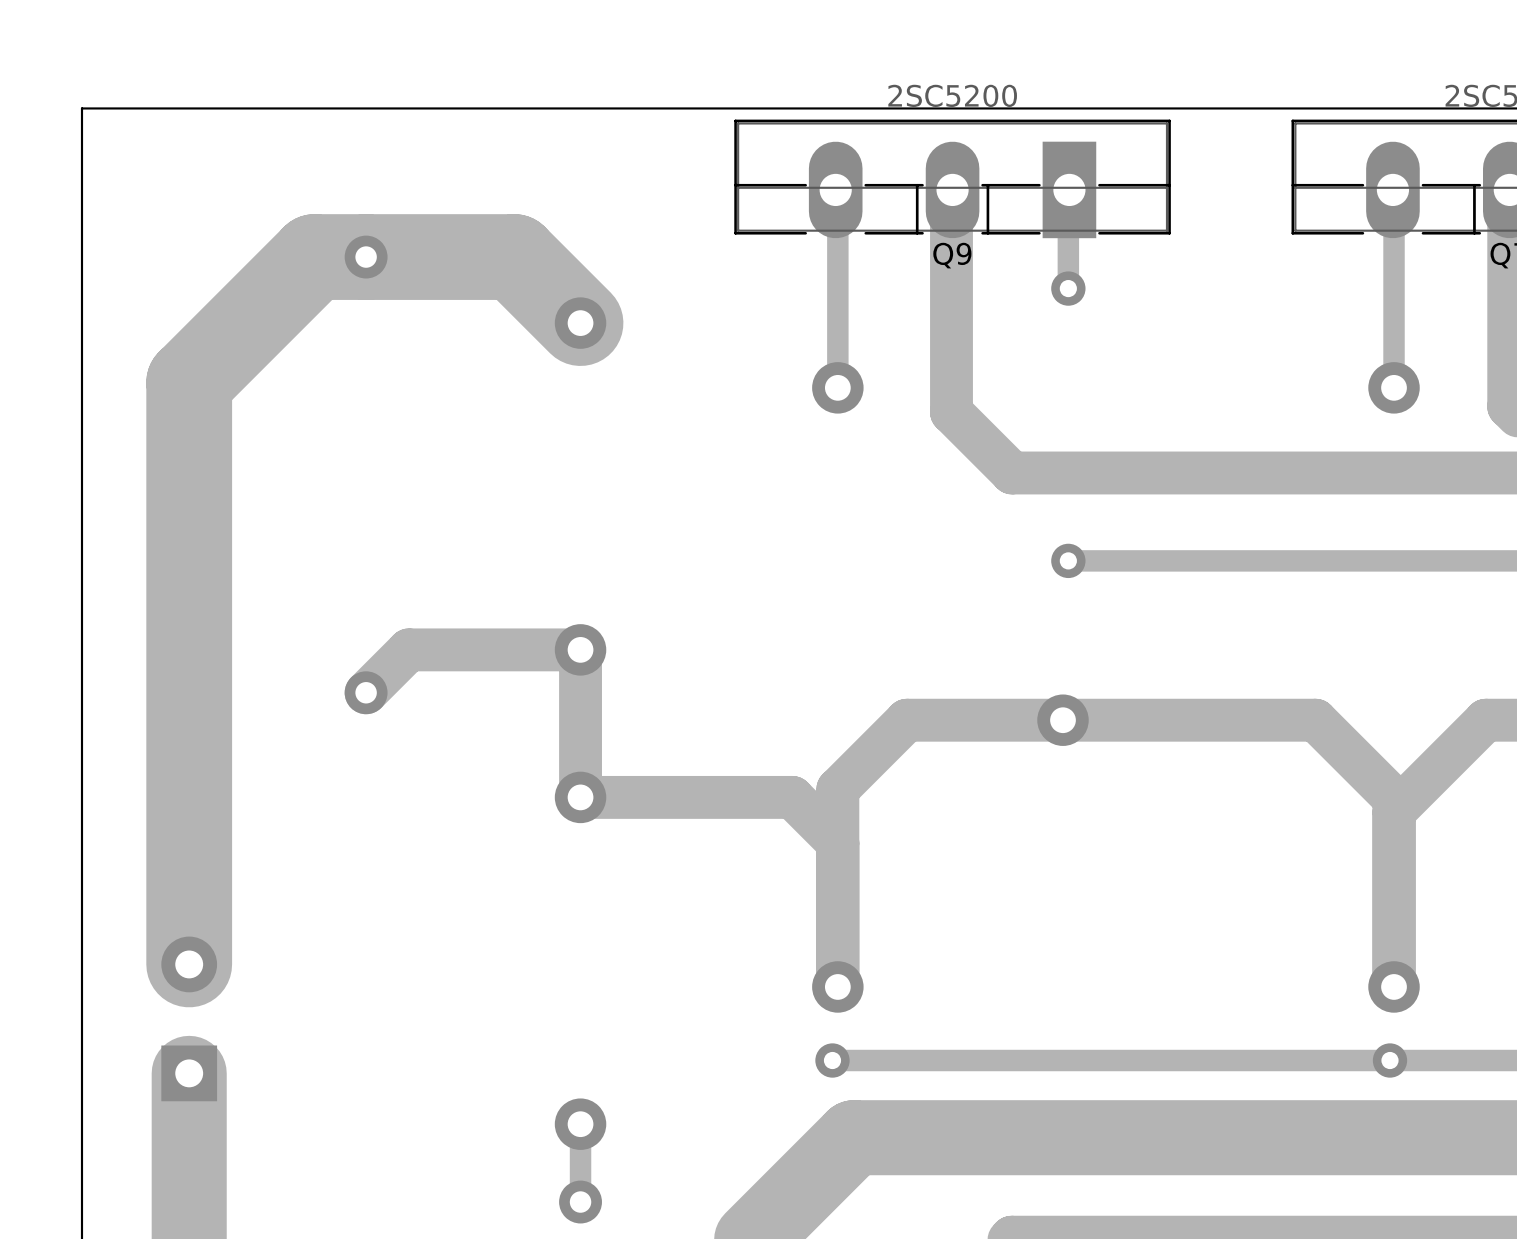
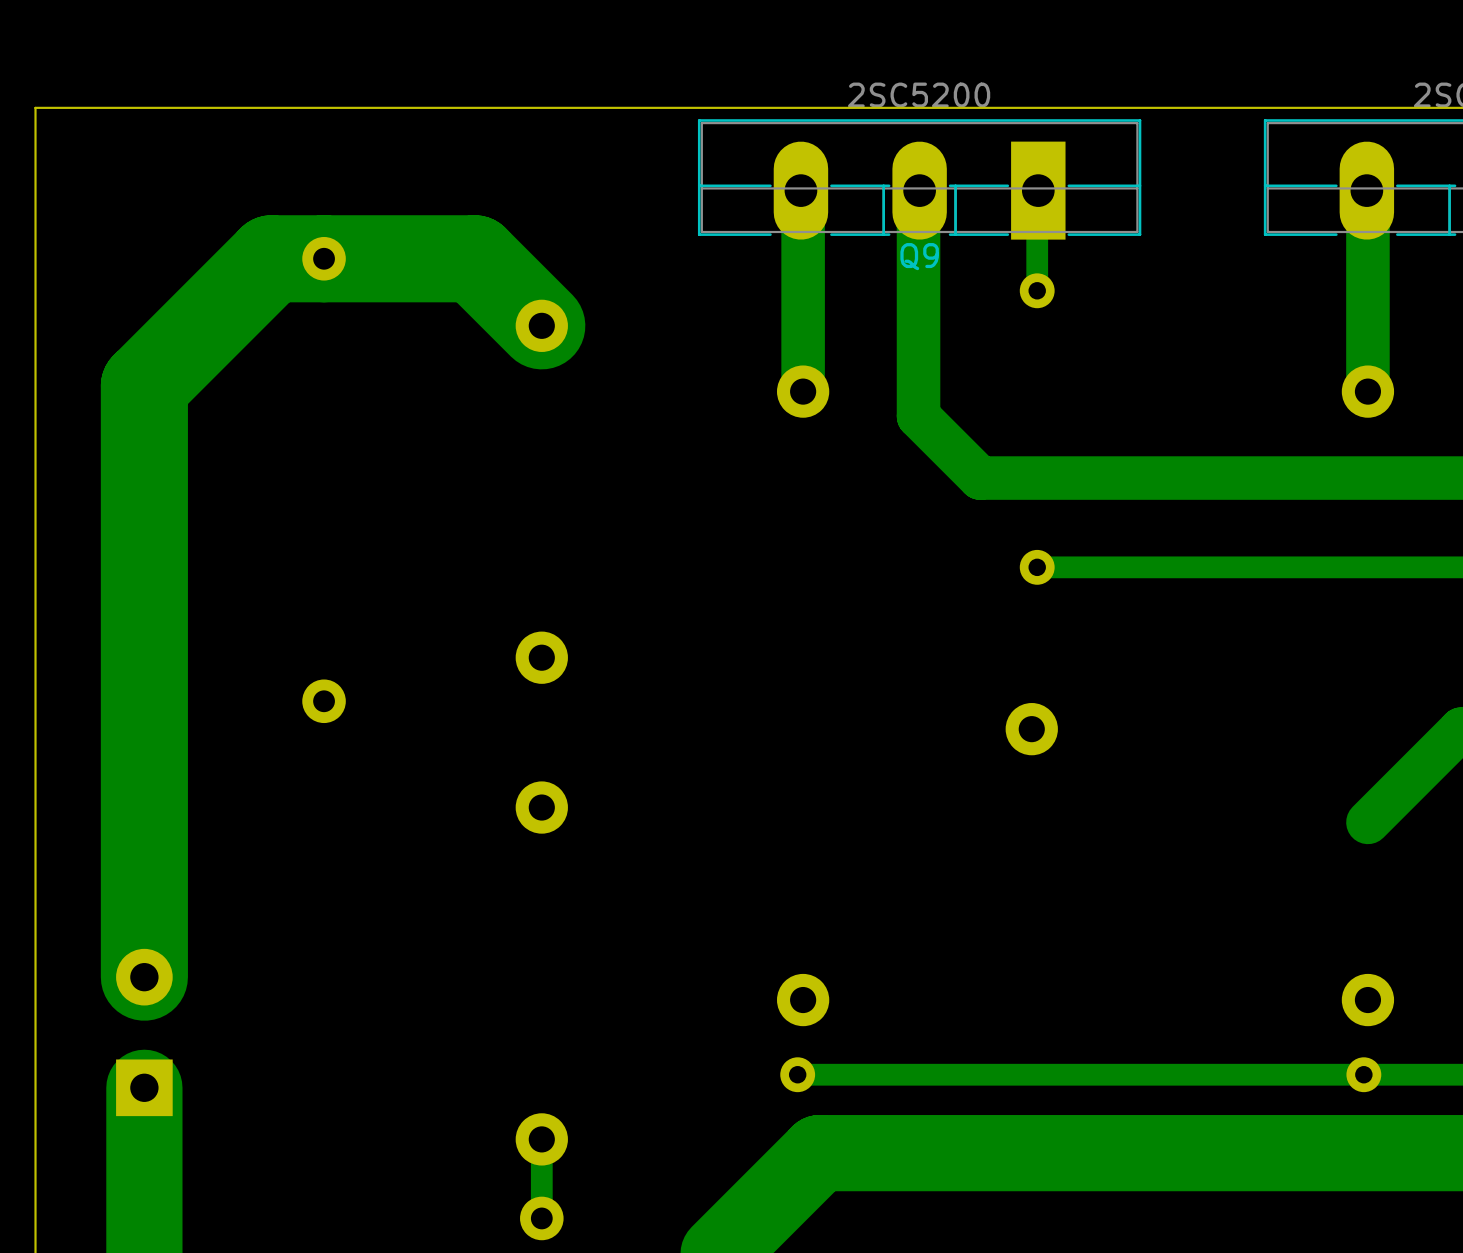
track width: thin (1394, 191) (1394, 387) -> thick (1367, 191) (1367, 391)
track width: thin (837, 192) (837, 387) -> thick (803, 192) (803, 391)
track: (366, 692) (408, 649) (580, 649) (580, 797) (792, 797) (837, 842) -> none
track: (1394, 986) (1394, 798) (1315, 720) (906, 720) (837, 789) (837, 986) -> none

